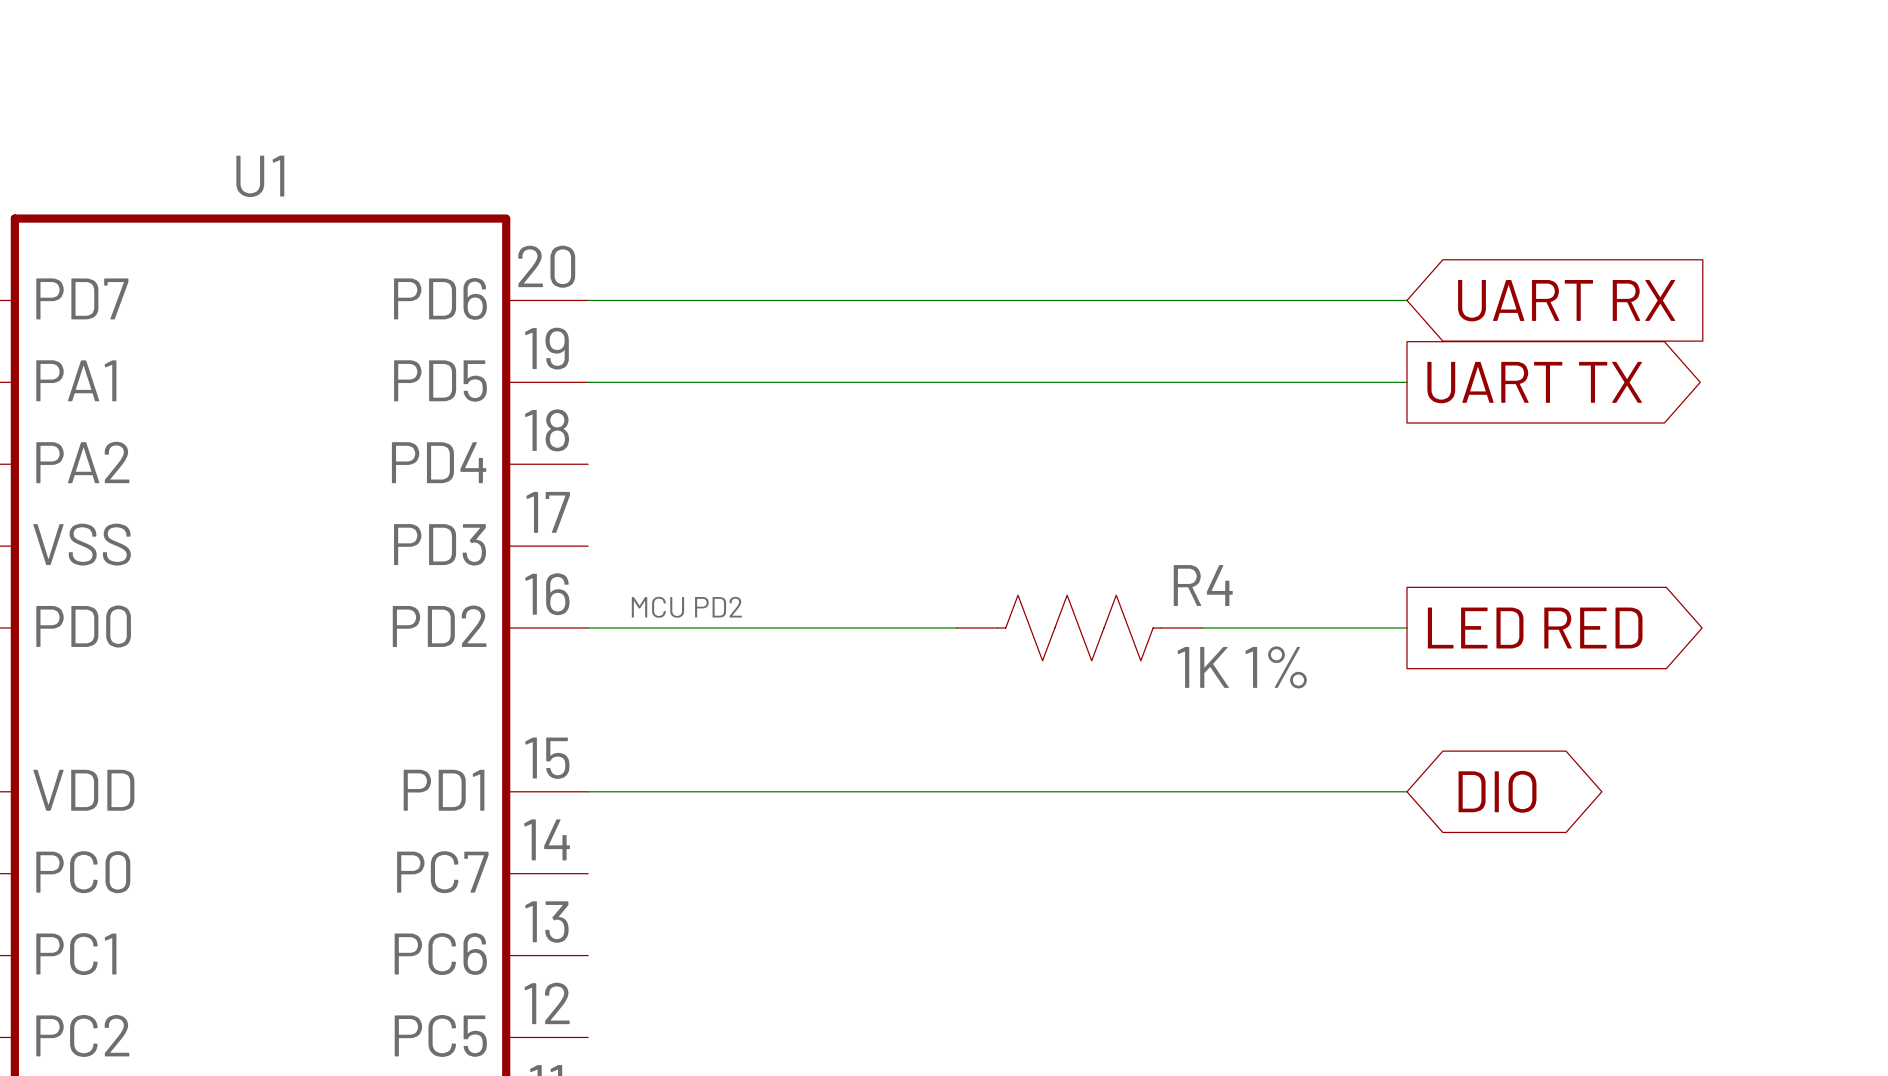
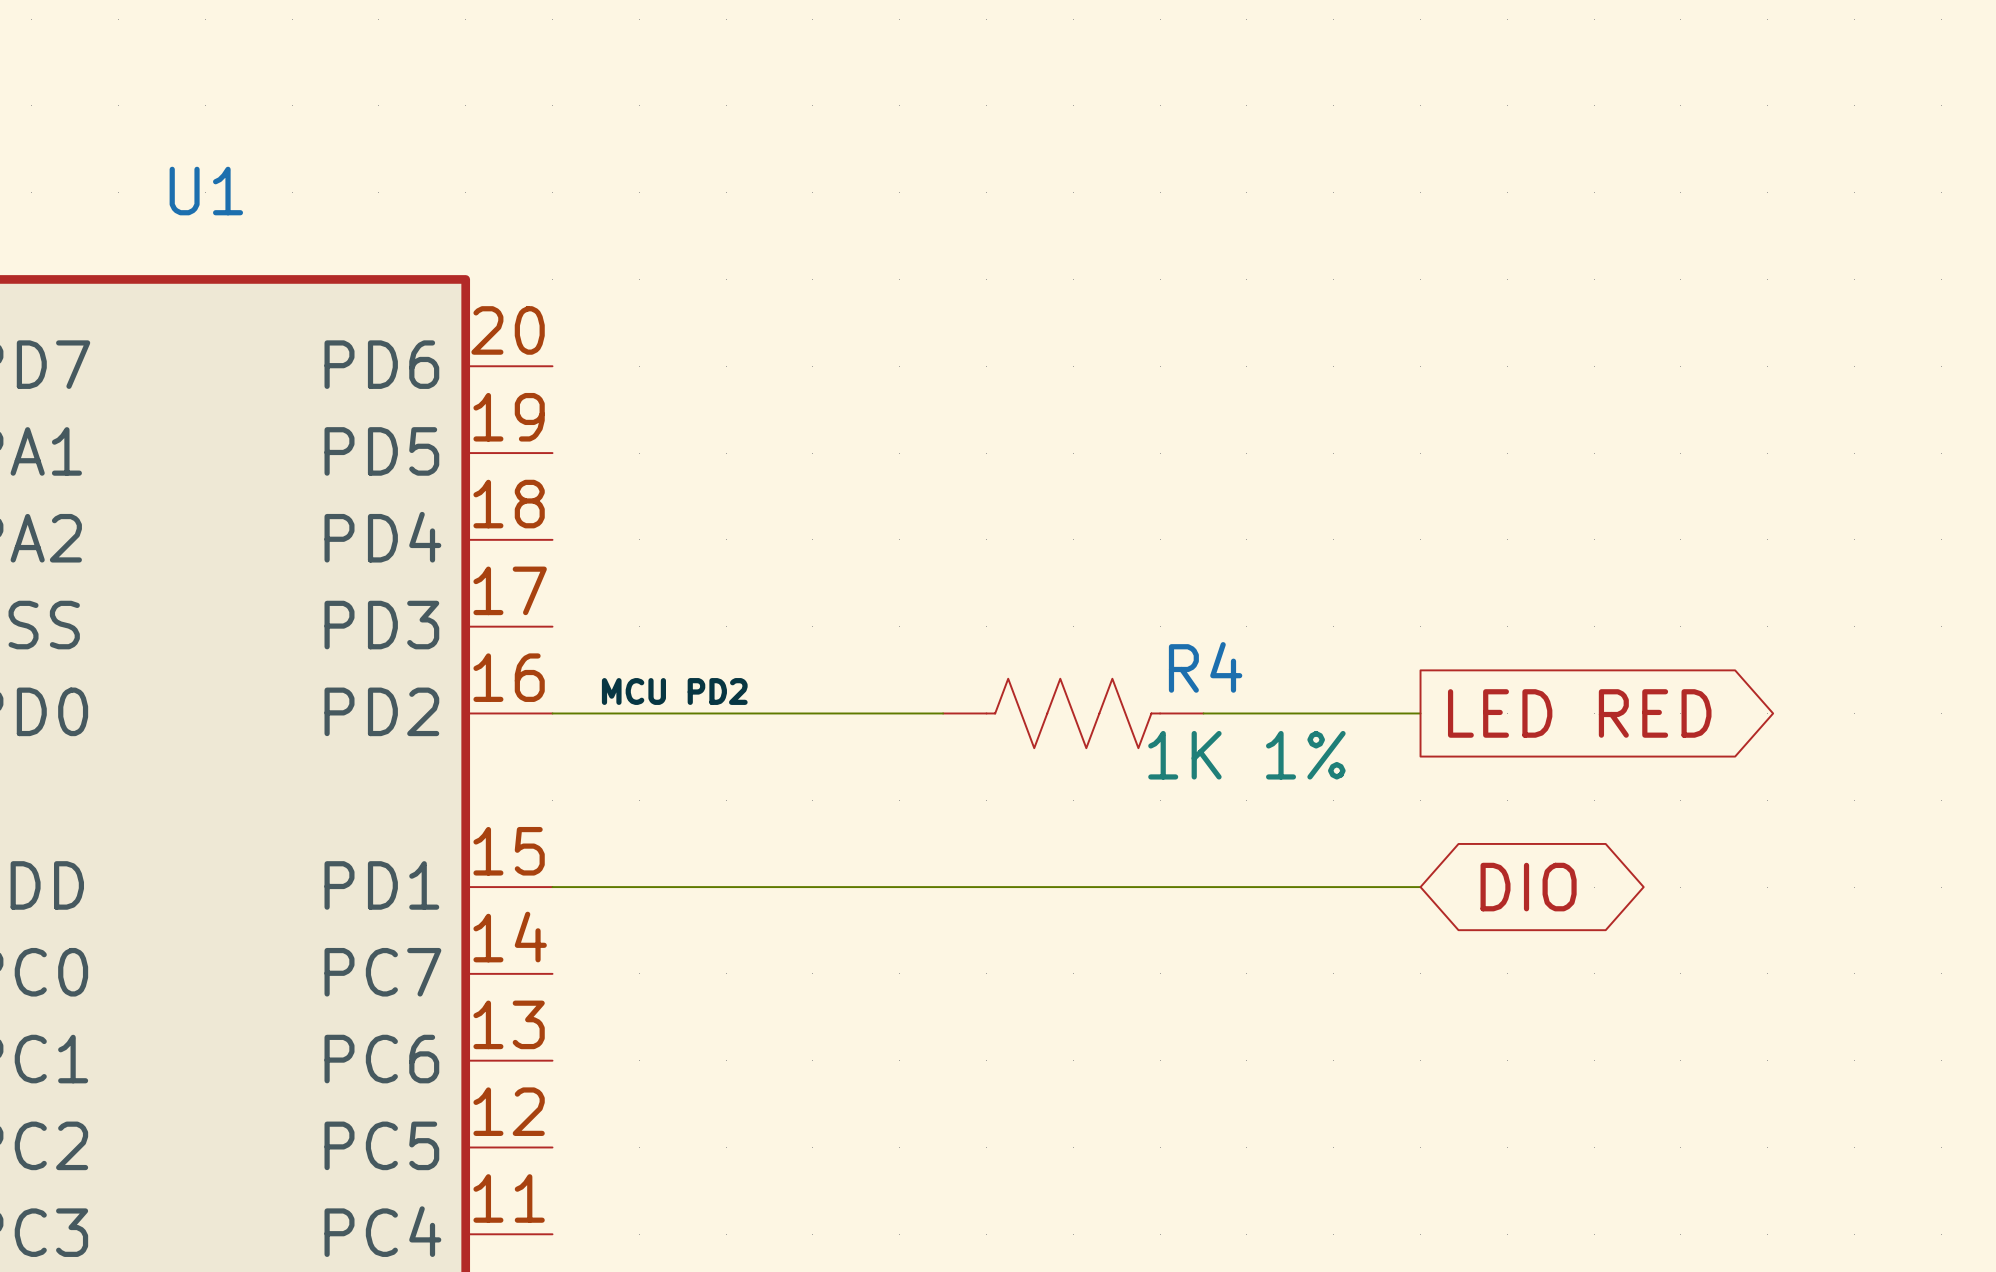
U1 name position: U1 (260, 176) -> U1 (206, 191)
wire: (588, 300) (1406, 300) -> none
global label: UART RX (1566, 300) -> none
wire: (588, 382) (1406, 382) -> none
global label: UART TX (1534, 382) -> none

